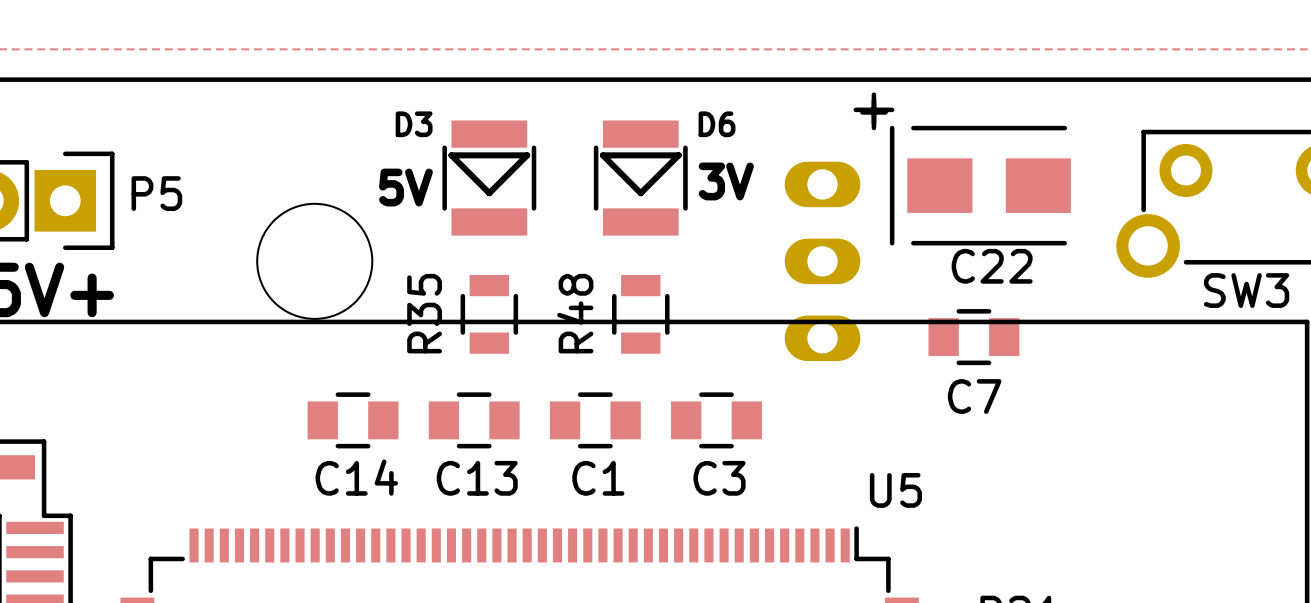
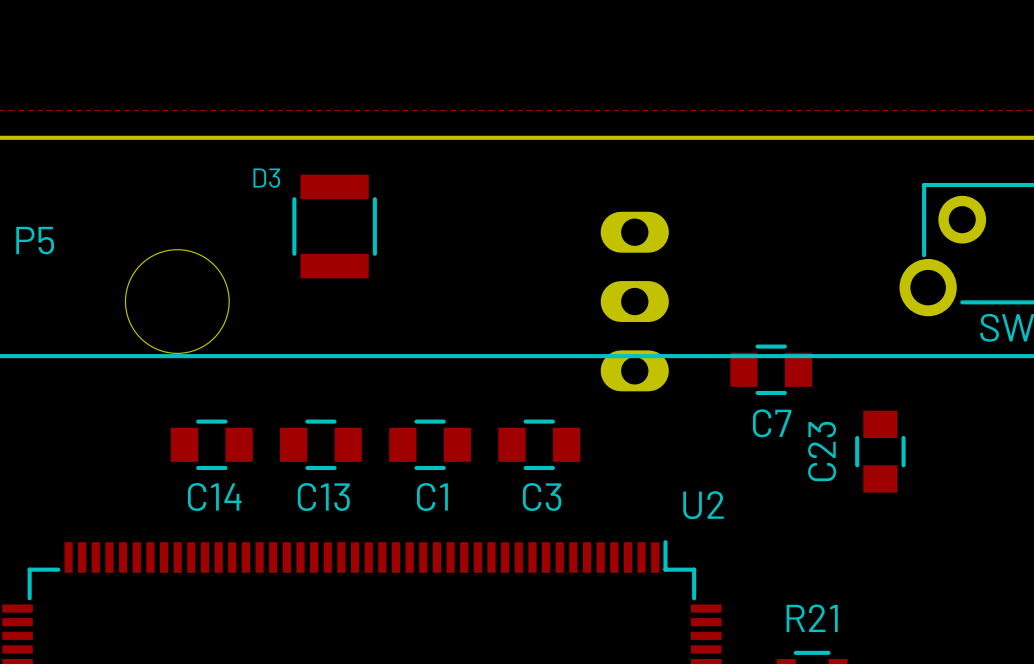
line: (451, 155) (527, 155) (489, 193) (451, 155) -> none
line: (602, 155) (640, 193) (678, 155) (602, 155) -> none
C22: (962, 168) -> none
D6: (640, 178) -> none
text: 3V (726, 181) -> none
text: 5V (405, 187) -> none
R35: (489, 314) -> none
R48: (640, 314) -> none
C23: none -> (880, 451)
U5 name: U5 (895, 490) -> U2 (703, 505)

